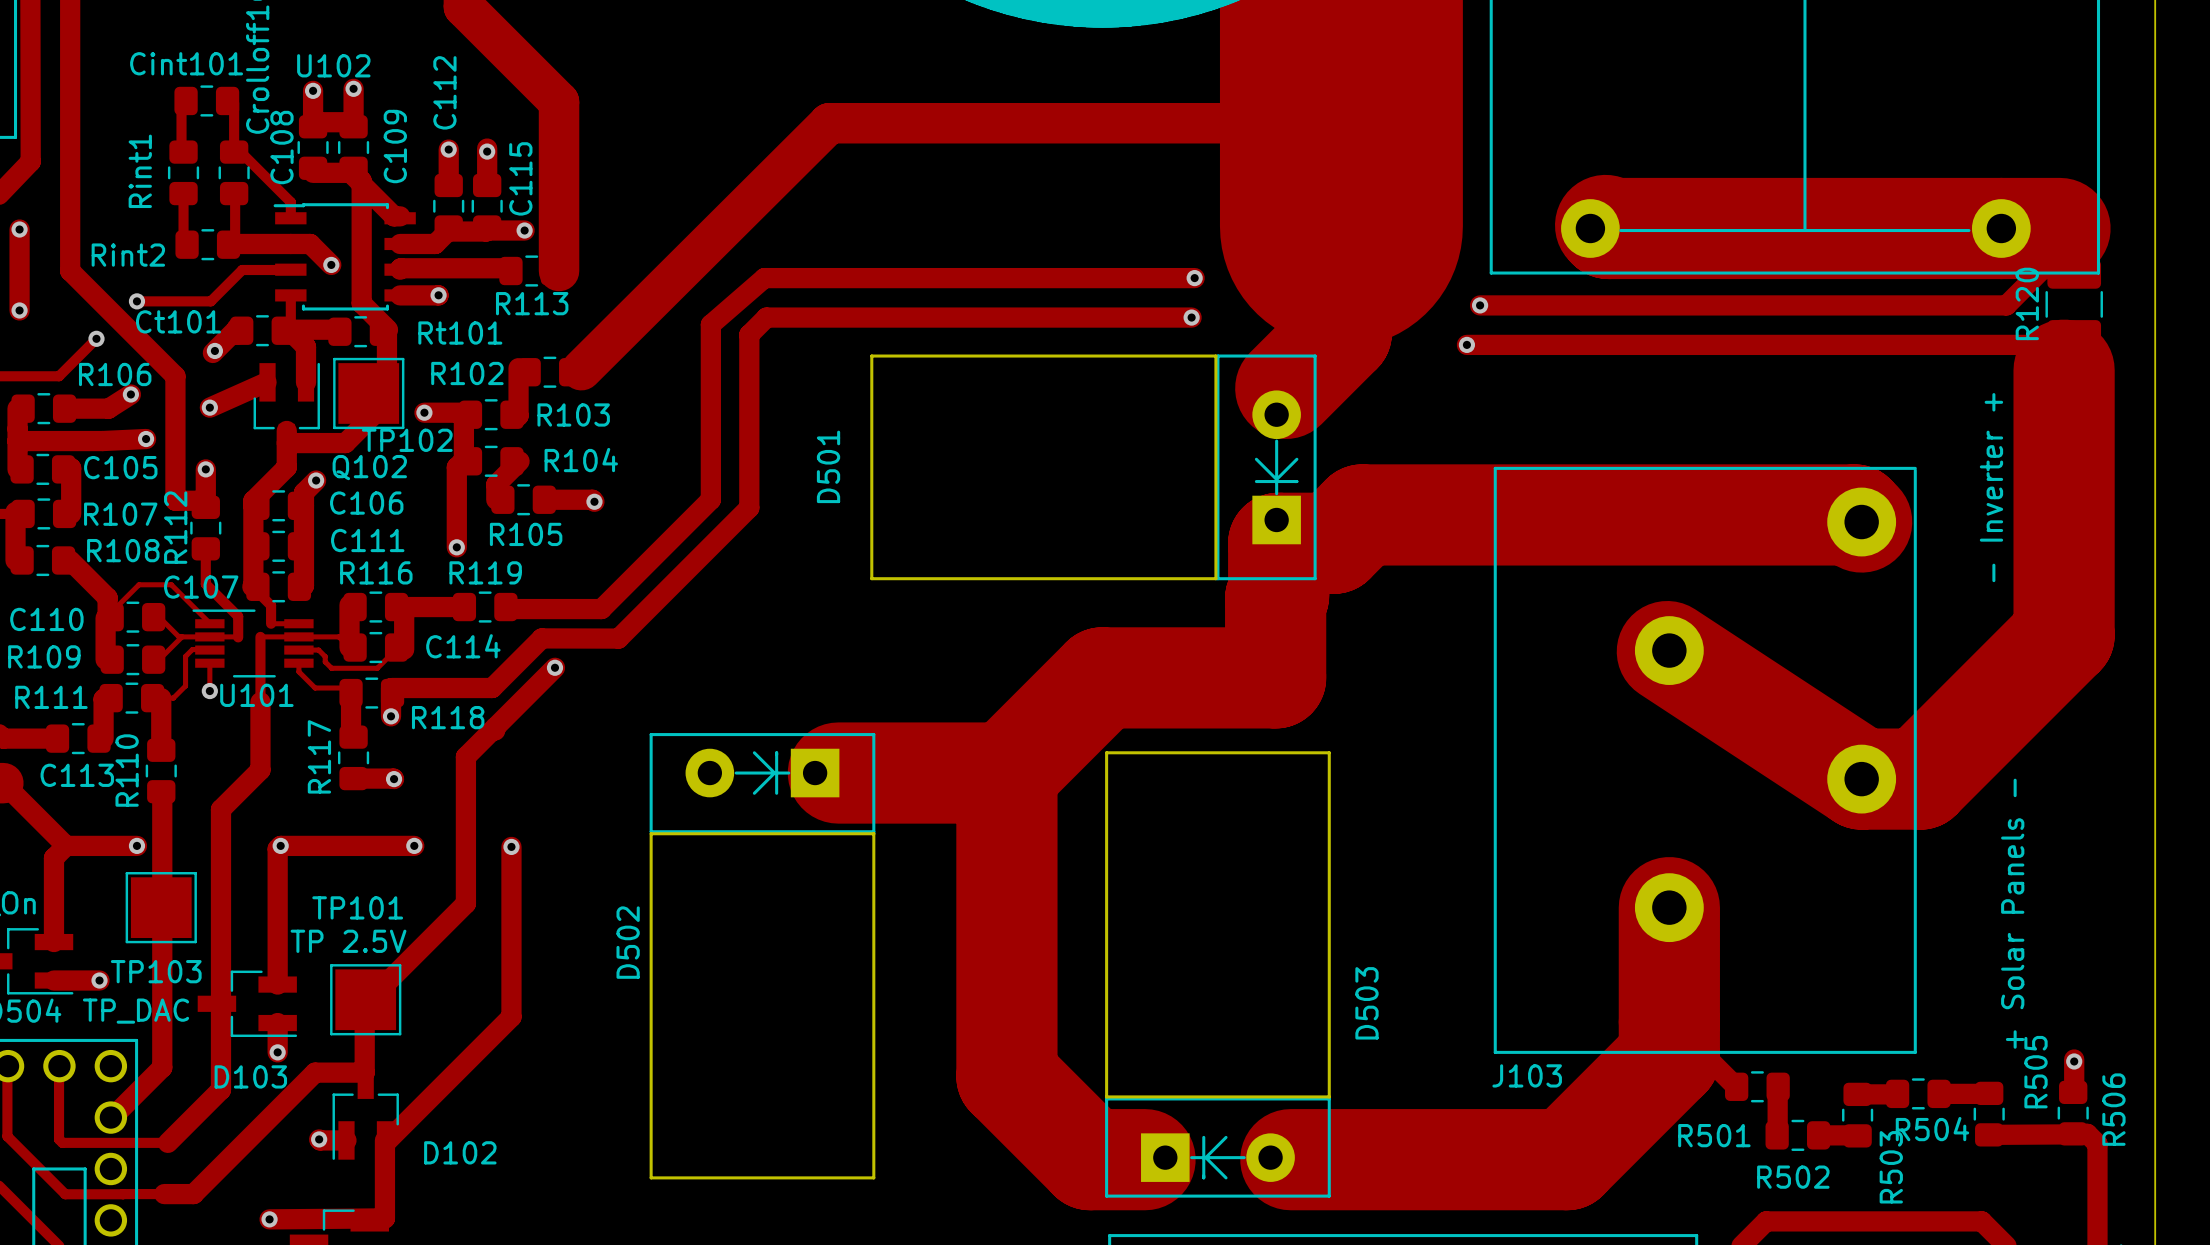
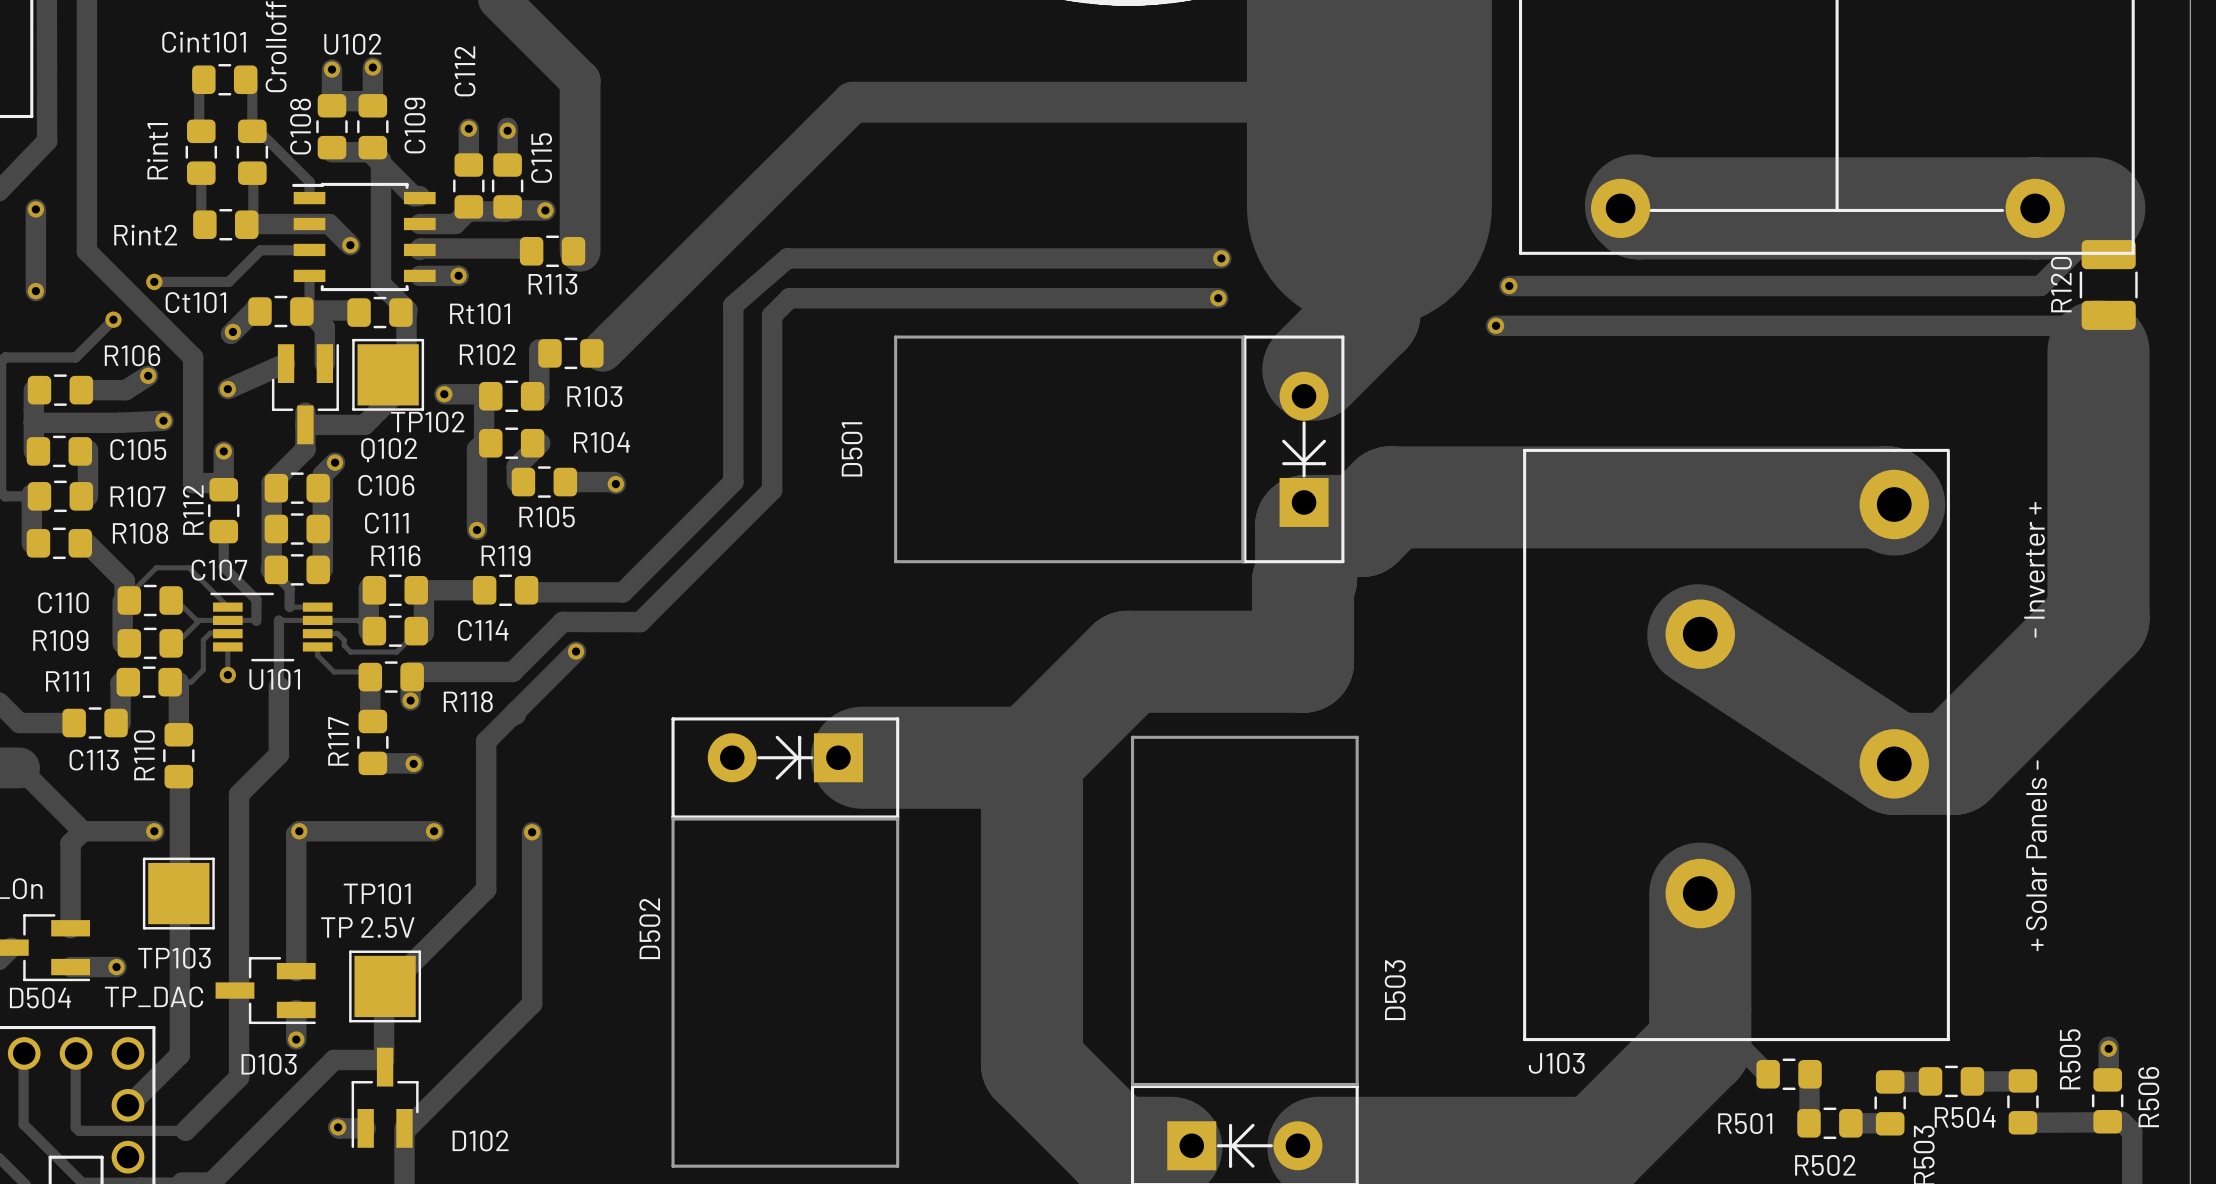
text position: - Inverter + (1991, 487) -> - Inverter + (2034, 569)
text position: + Solar Panels - (2012, 913) -> + Solar Panels - (2036, 855)

